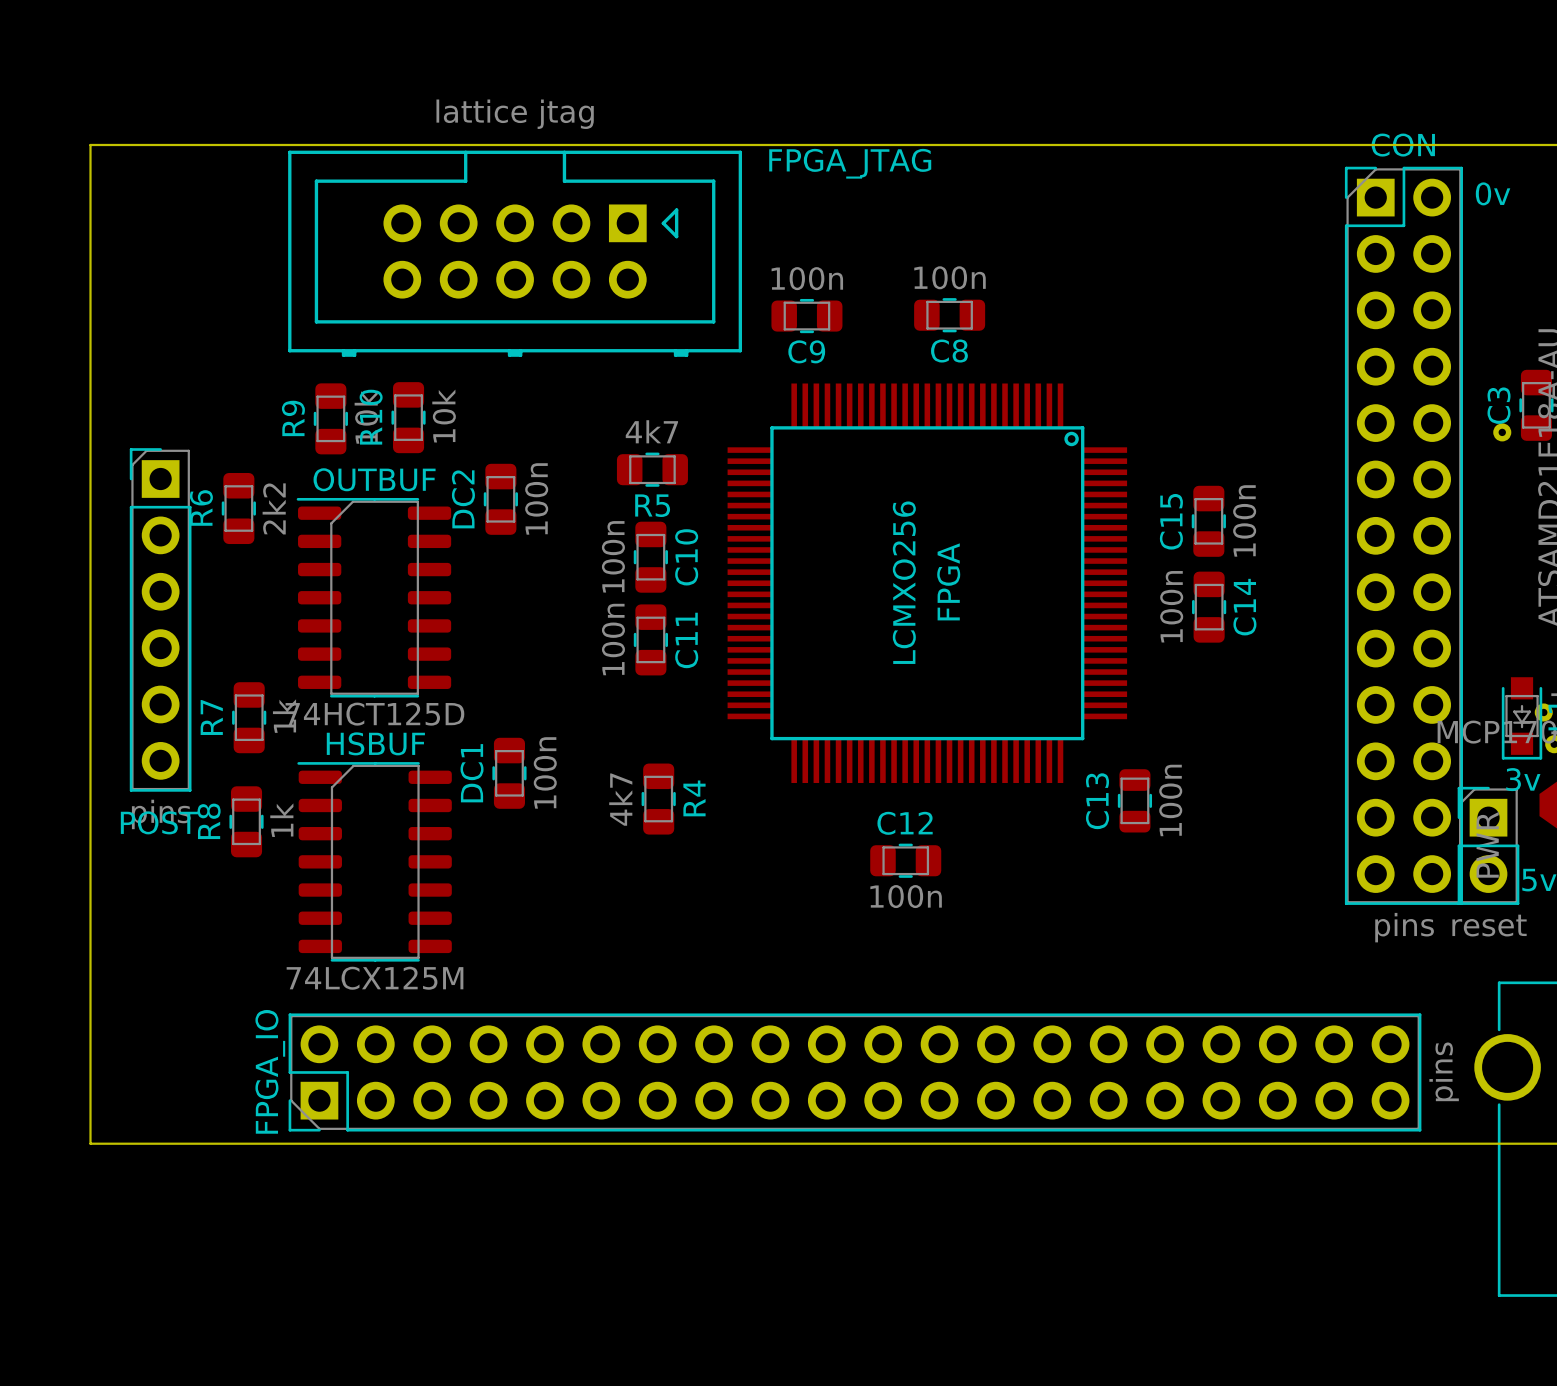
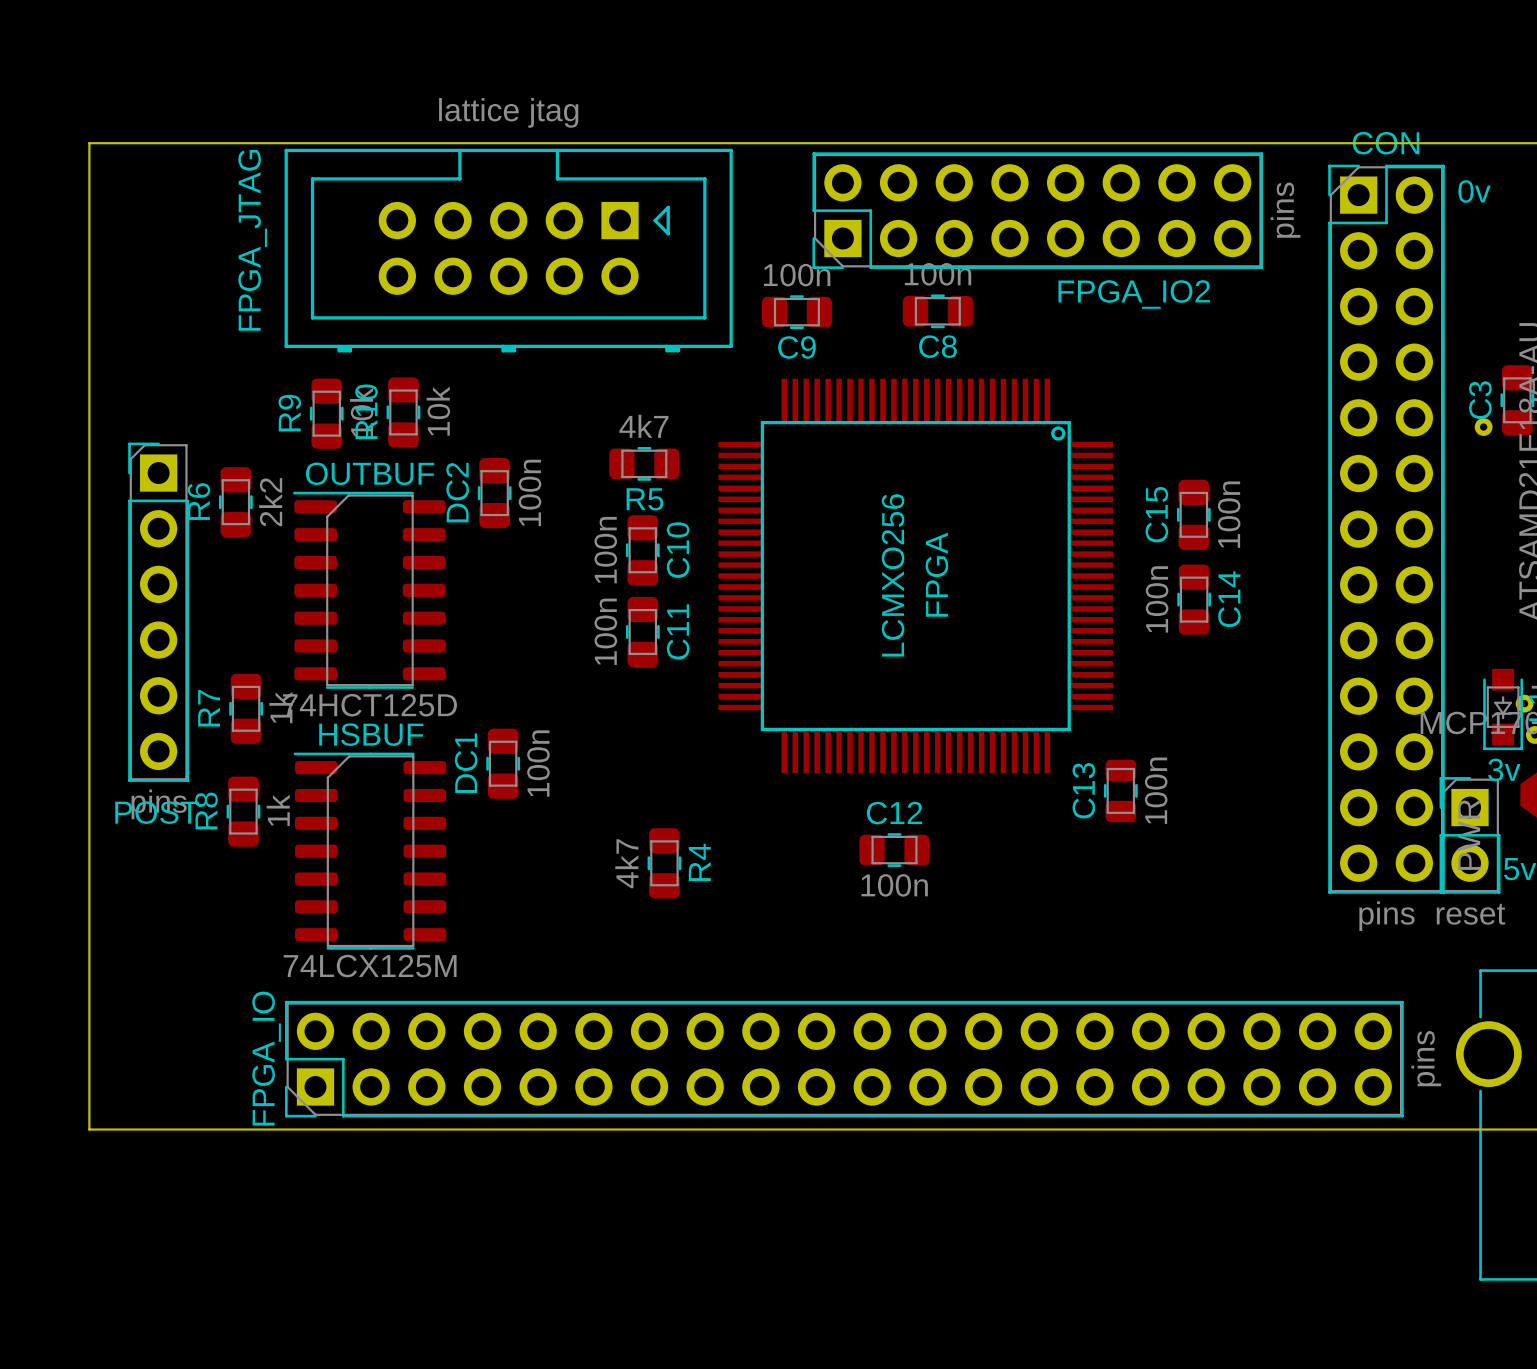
FPGA_JTAG name rotation: 0° (850, 163) -> 90° counterclockwise (252, 240)
FPGA_JTAG name position: FPGA_JTAG (850, 163) -> FPGA_JTAG (252, 240)
FPGA_IO2: none -> pins (1037, 210)
R4 position: (658, 799) -> (664, 863)

